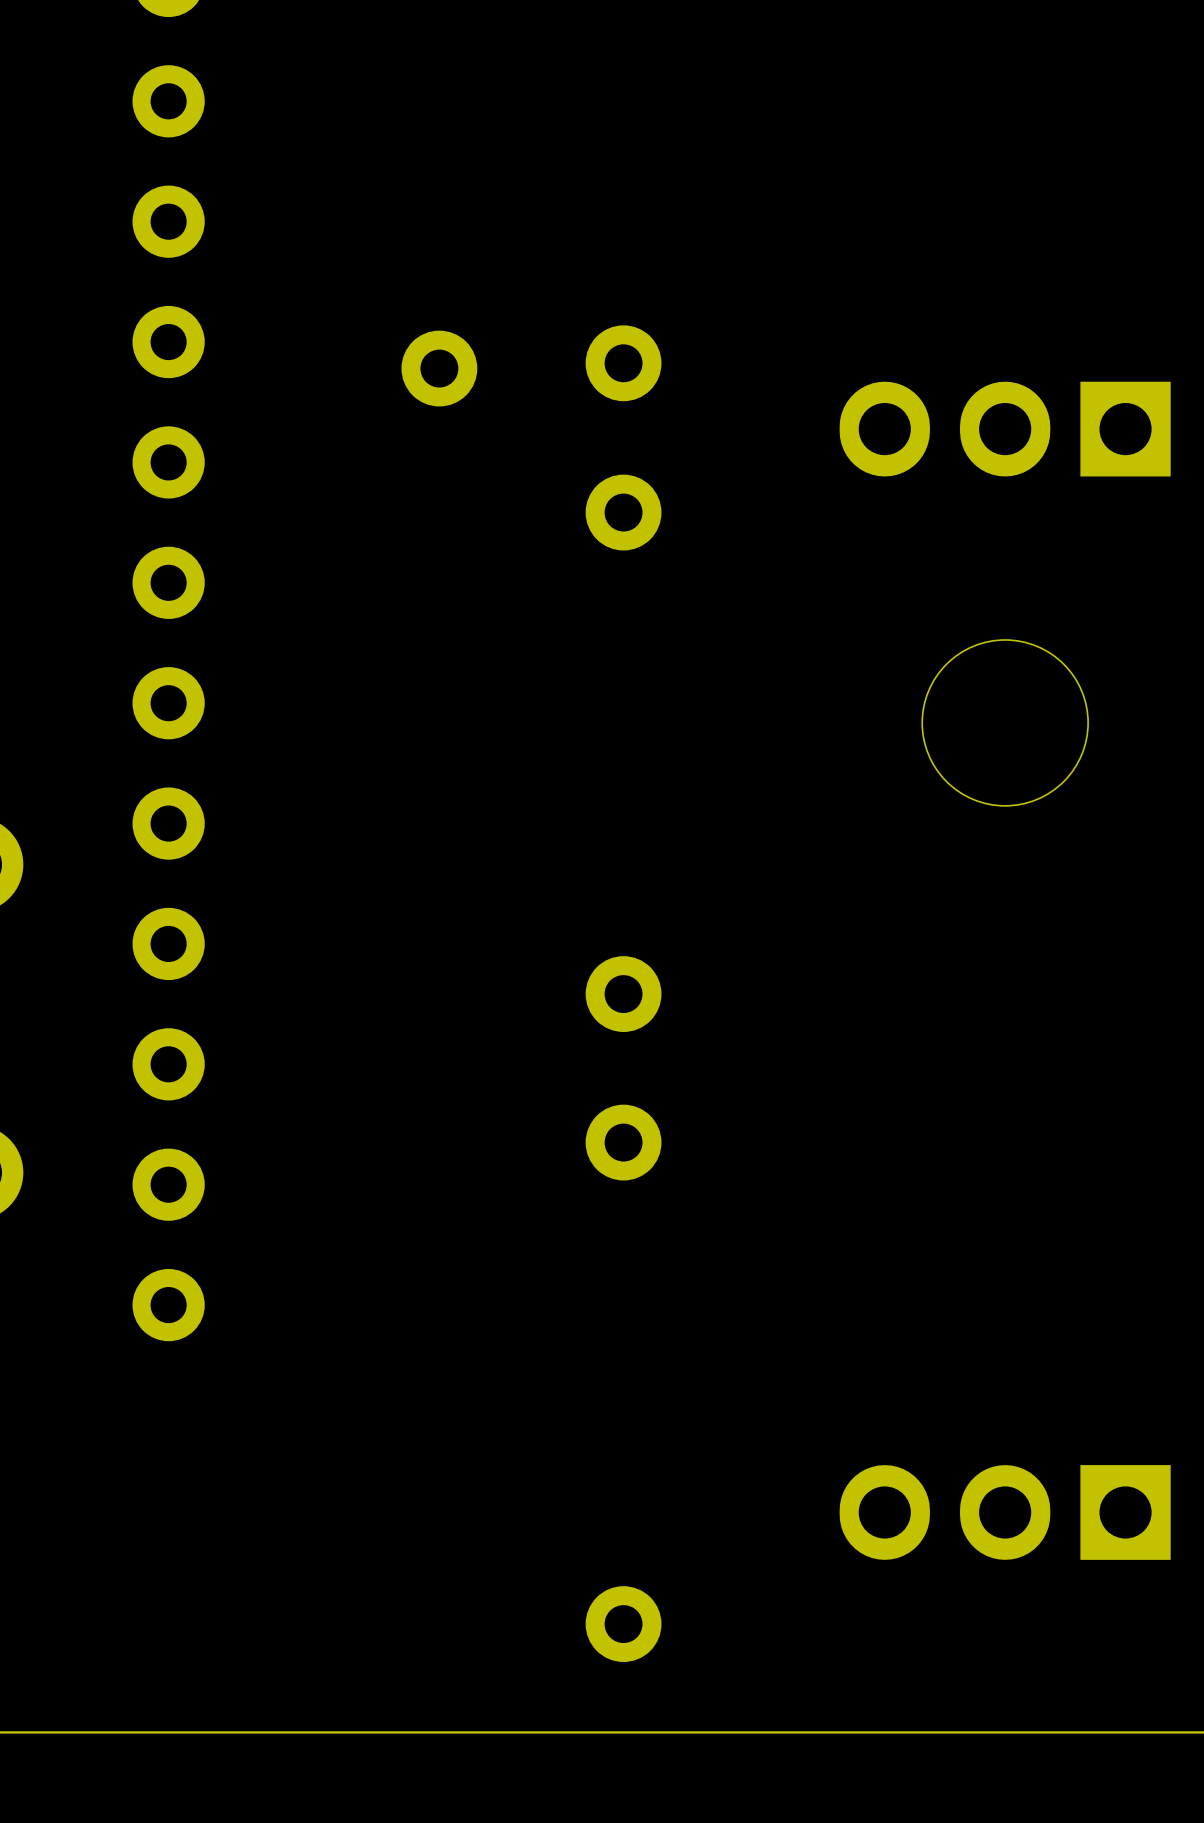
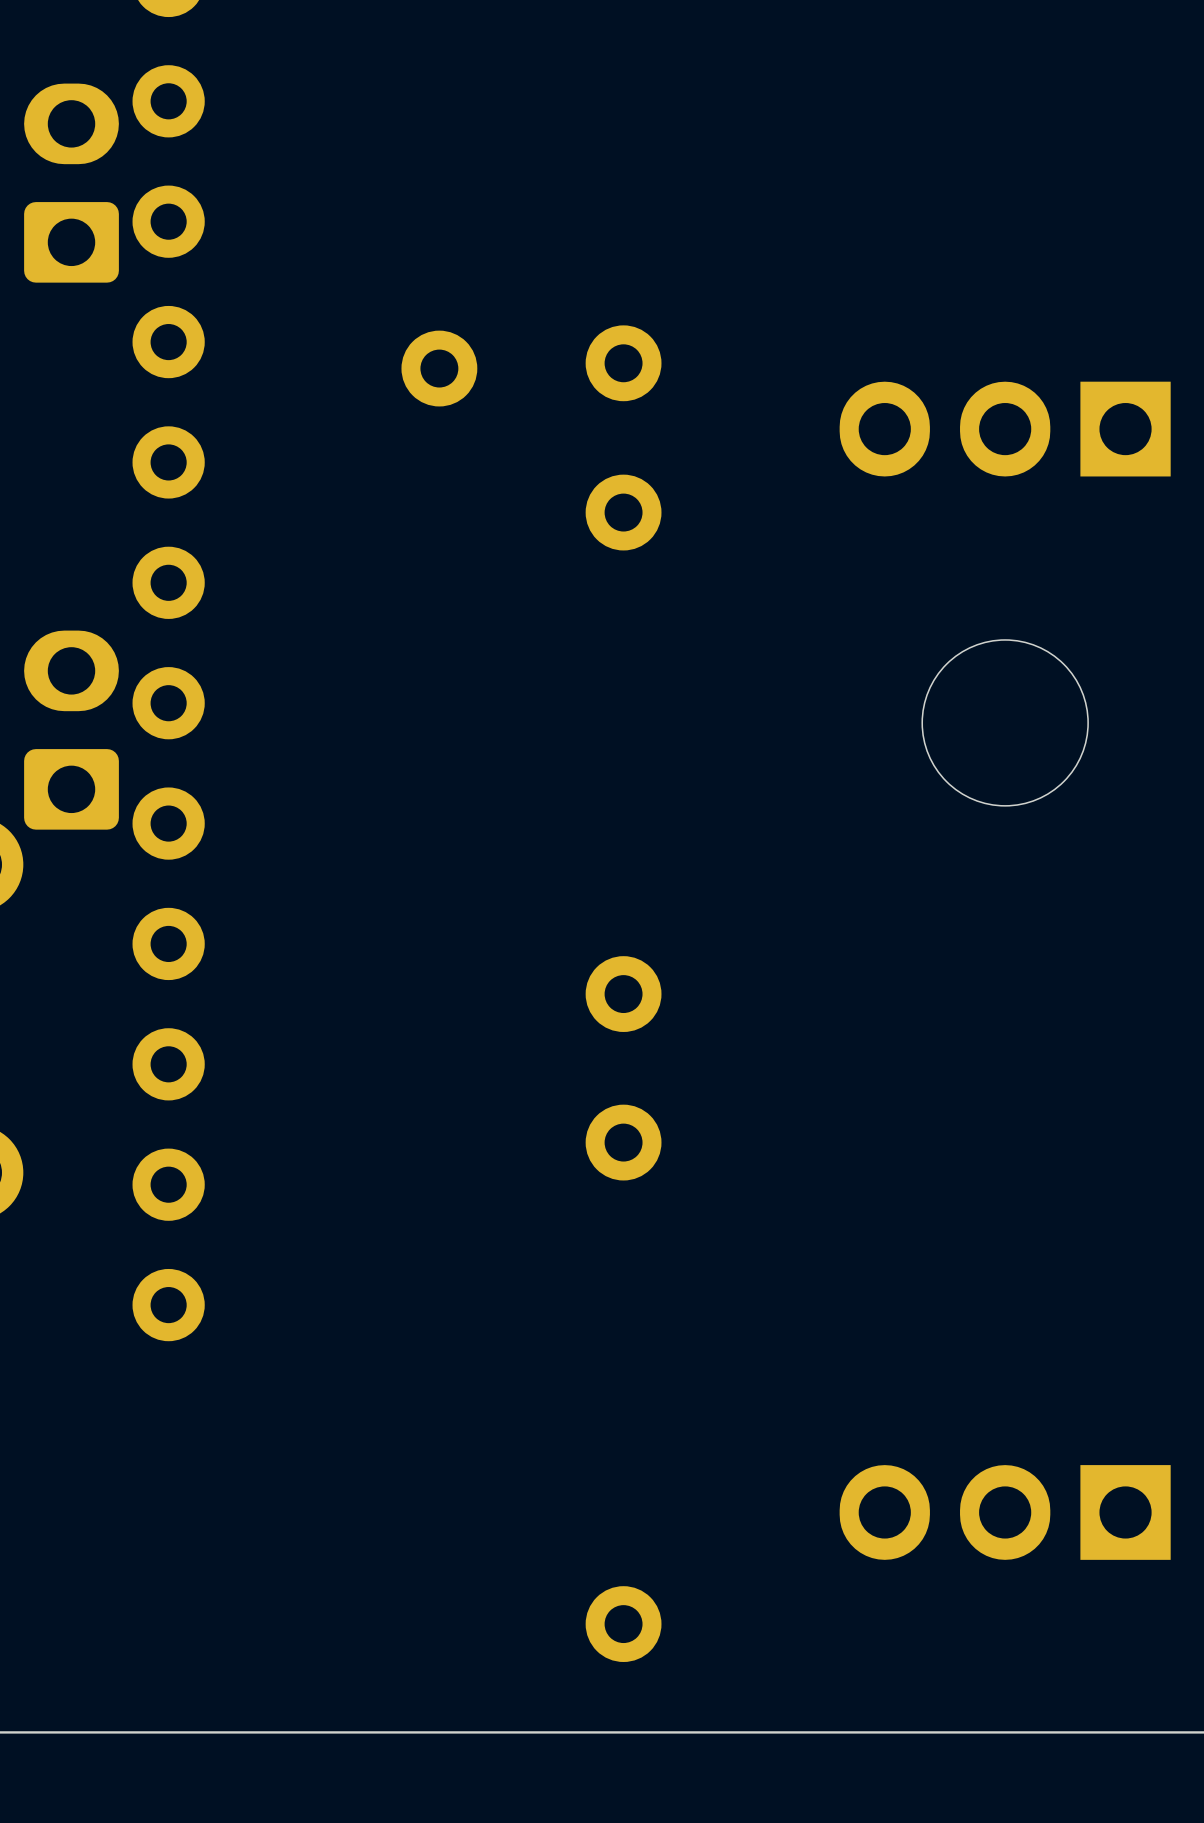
part: none -> (71, 183)
part: none -> (71, 730)

